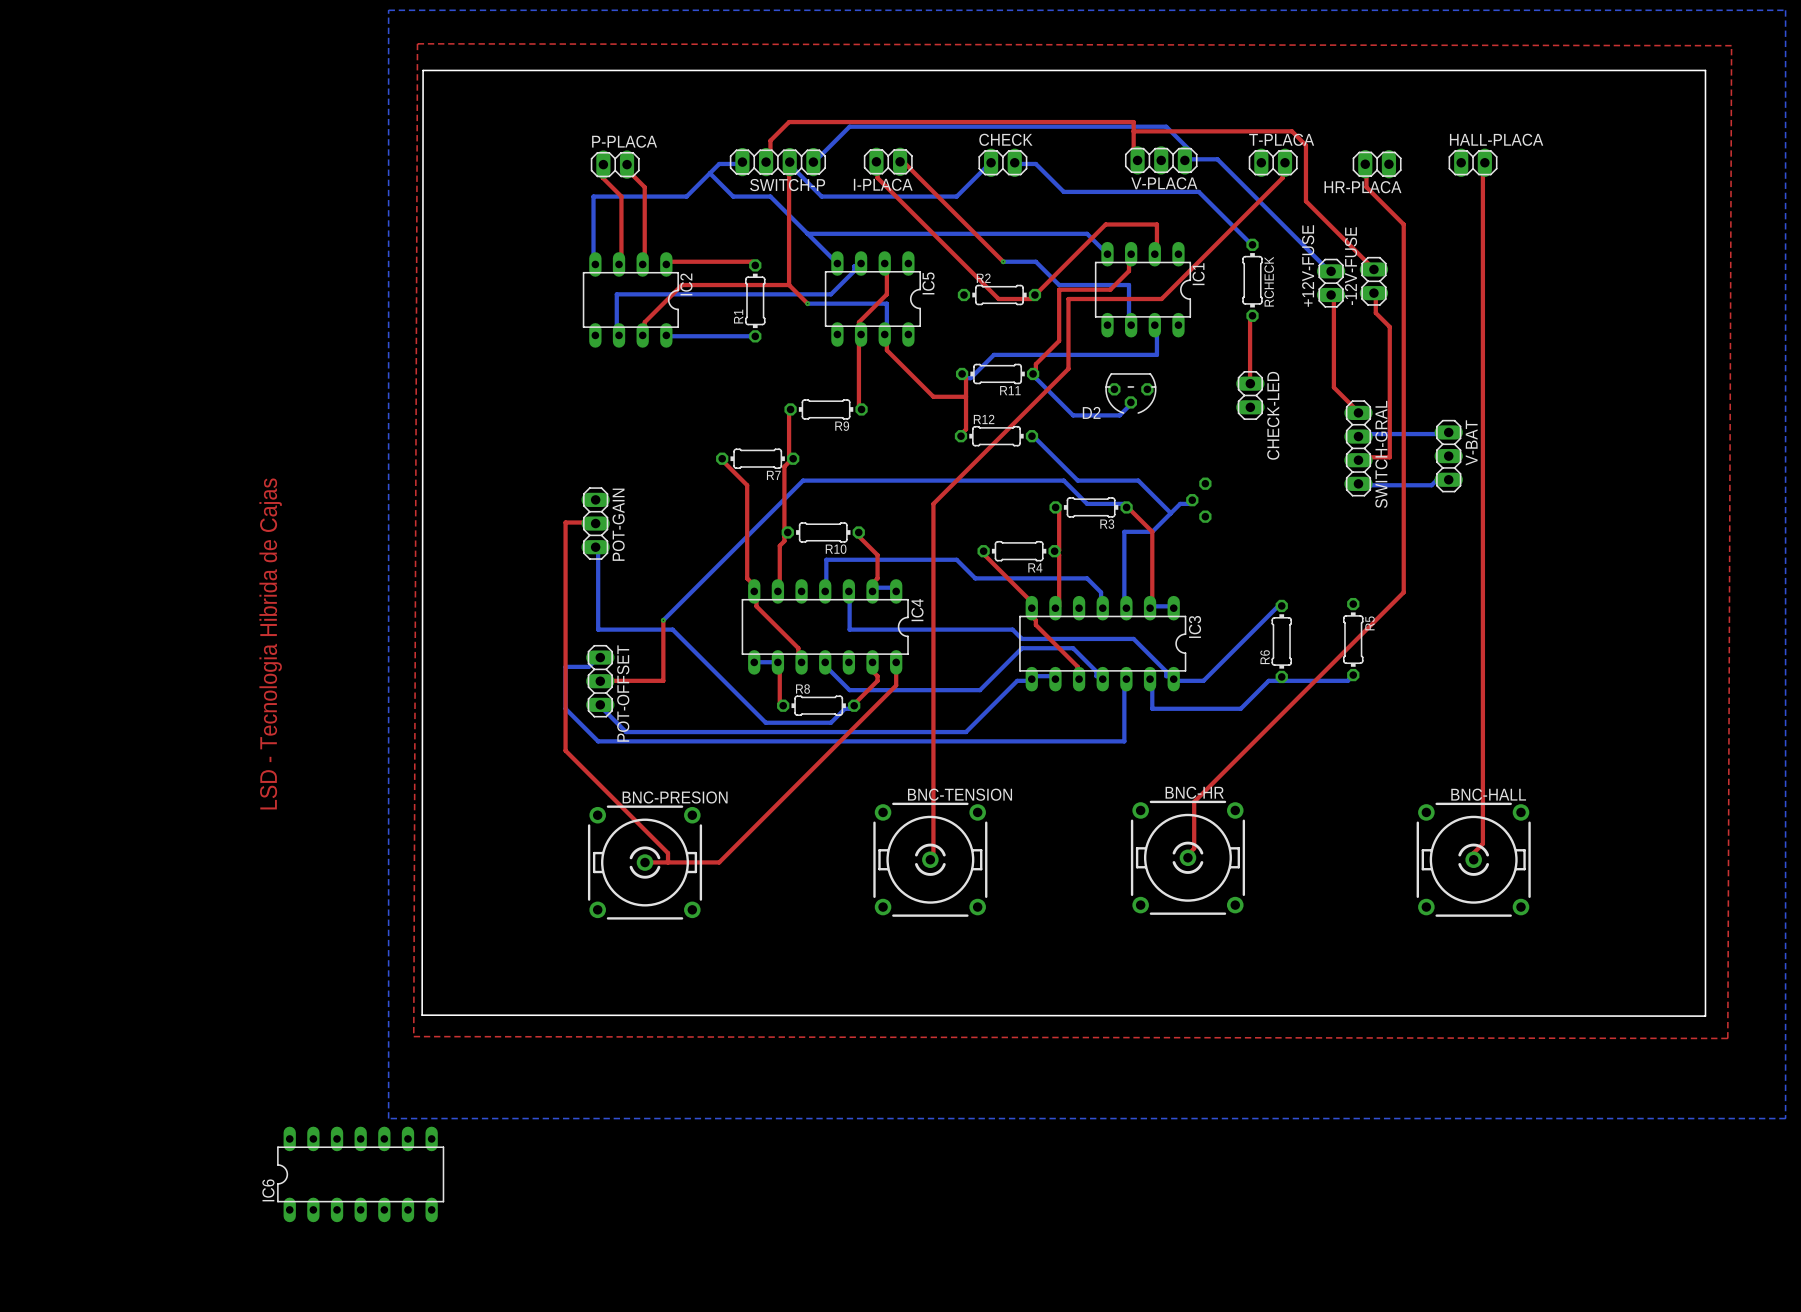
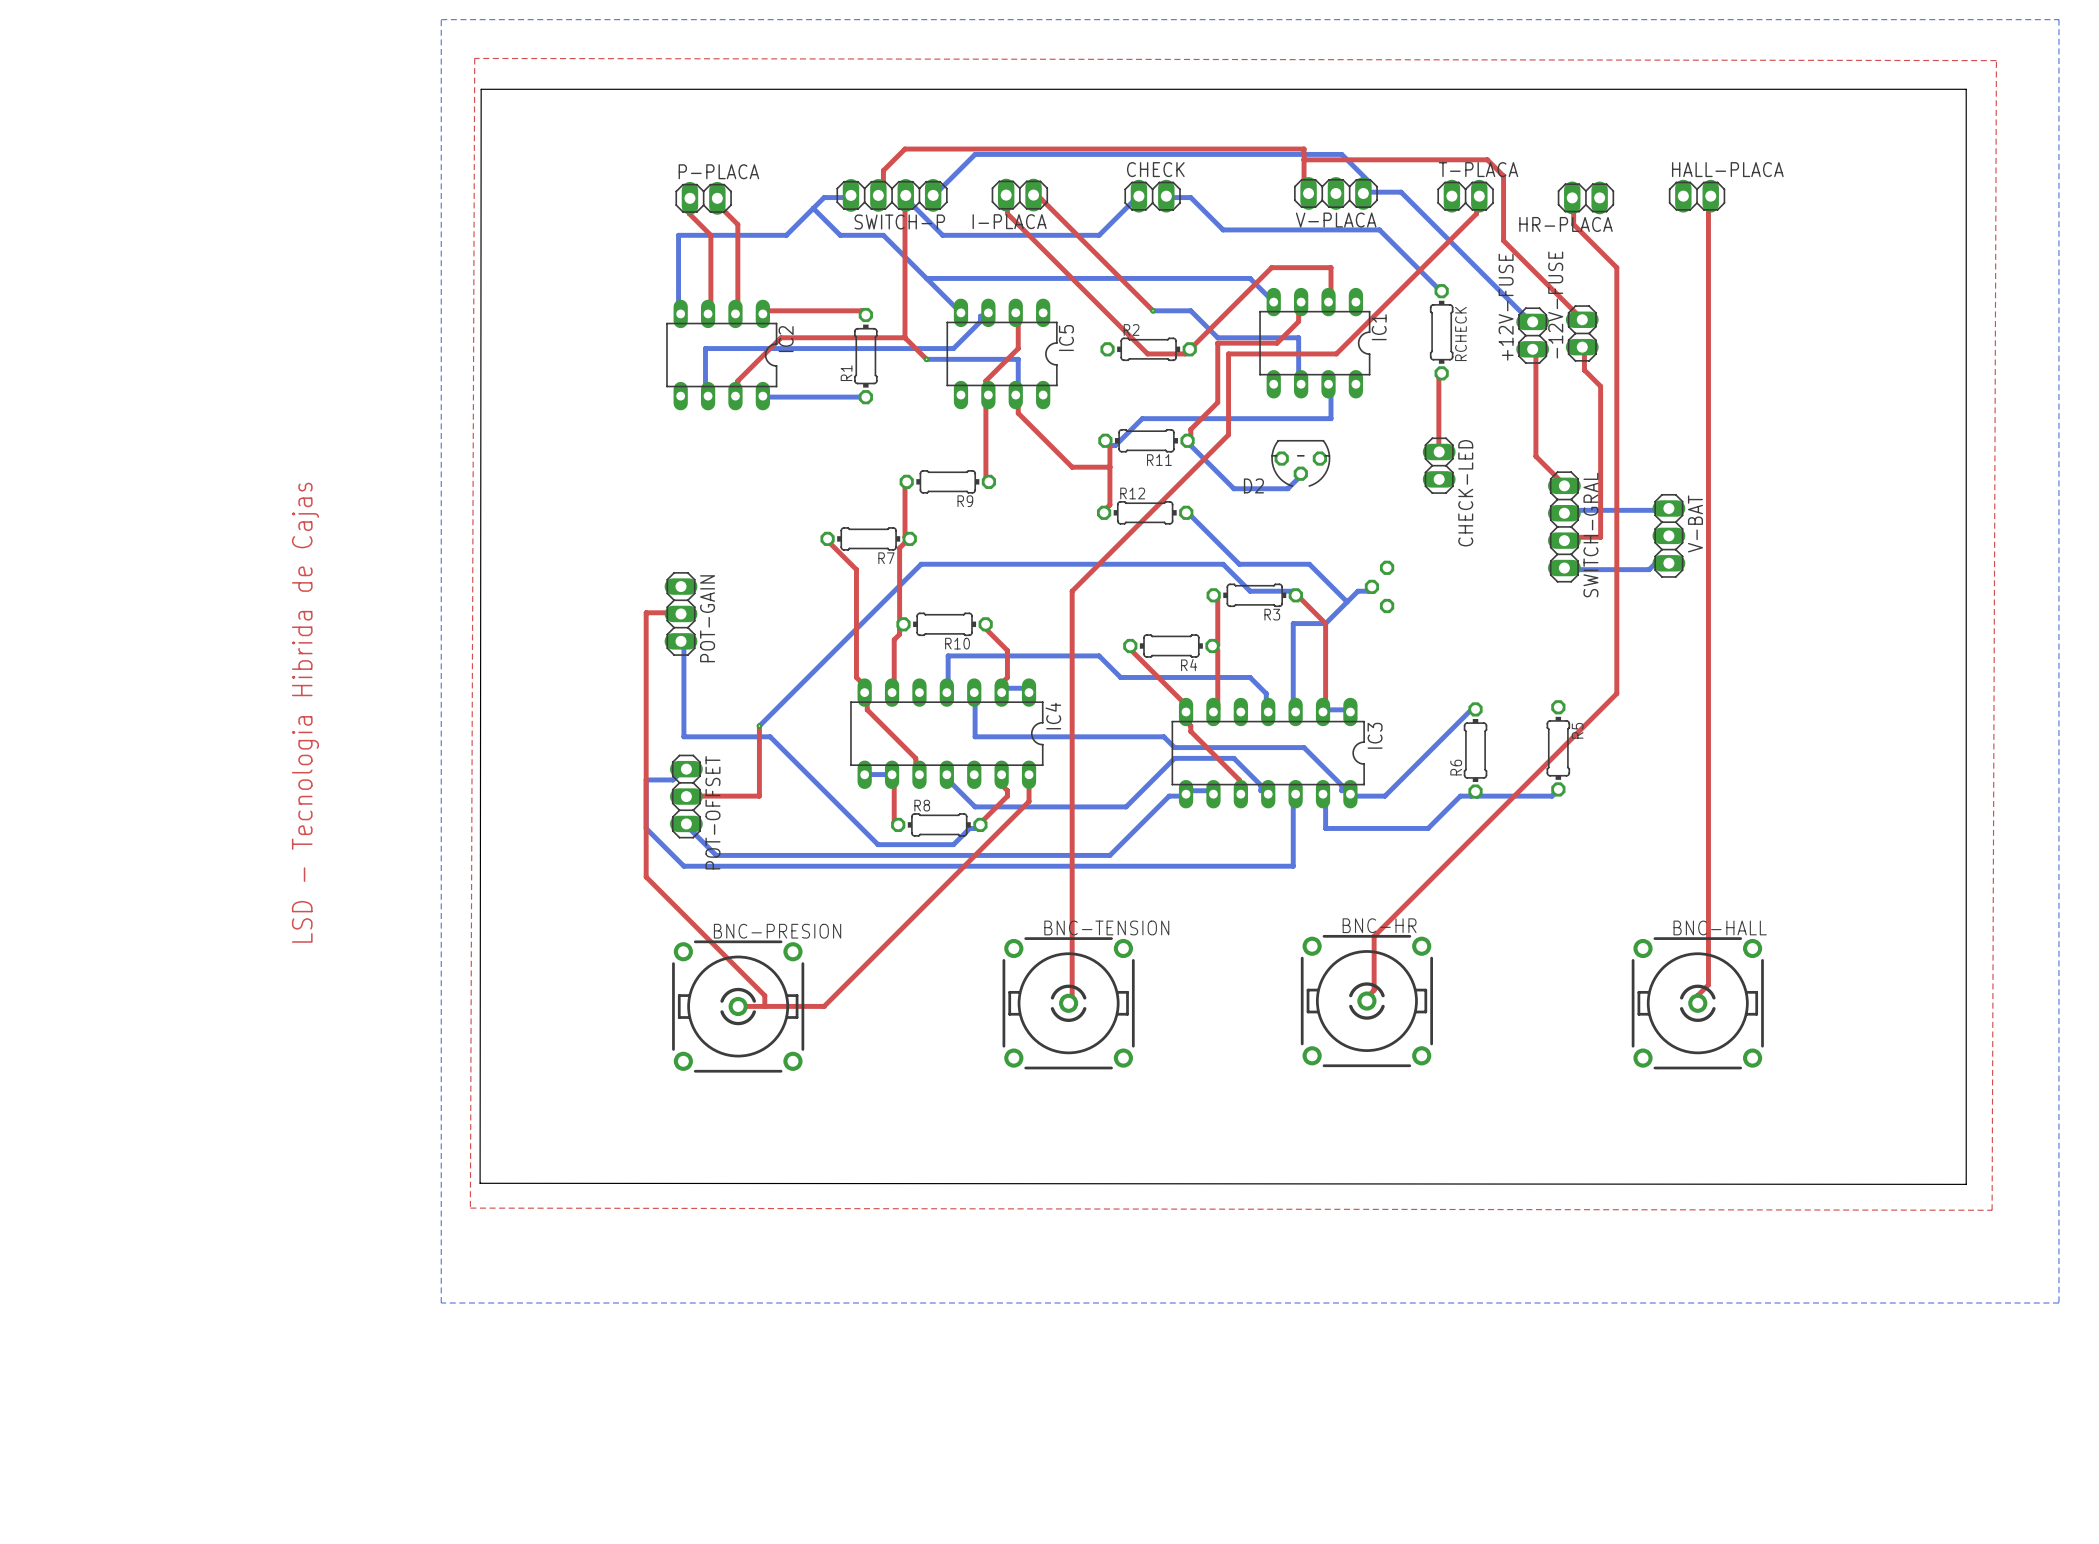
IC6: (360, 1174) -> none

